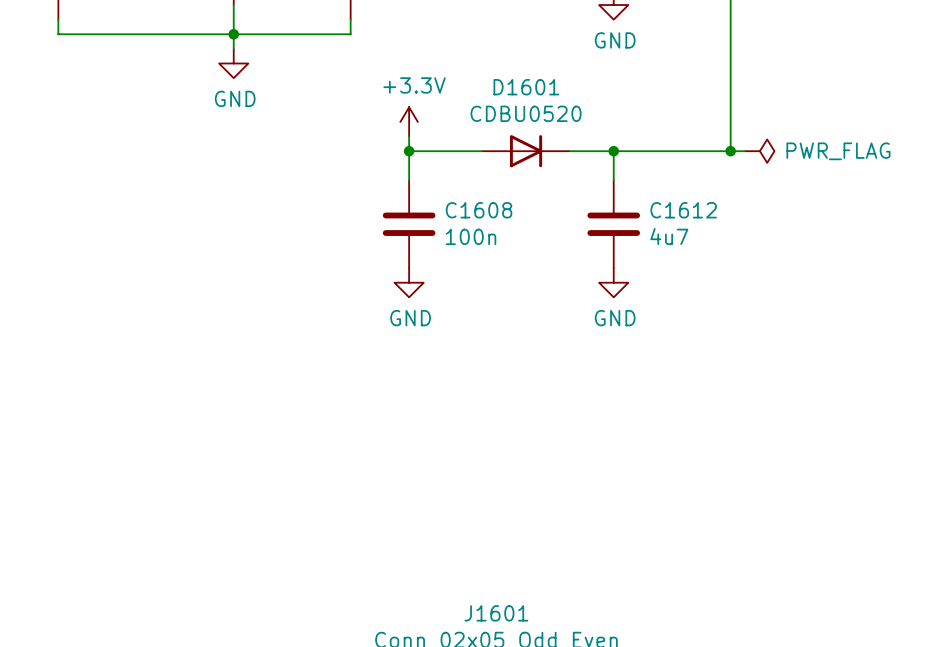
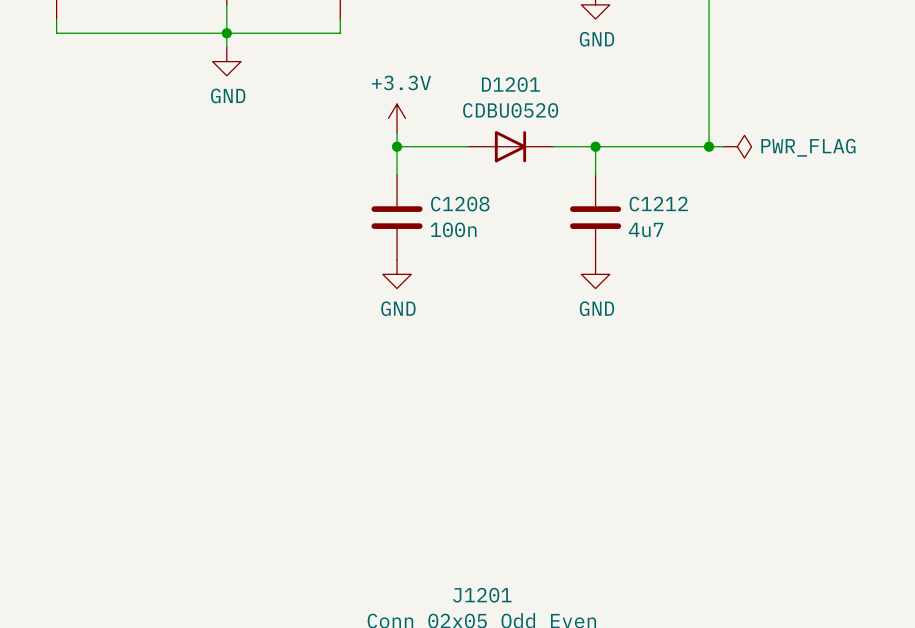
D1601 name: D1601 (526, 87) -> D1201 (510, 84)
C1608 name: C1608 (479, 210) -> C1208 (460, 204)
C1612 name: C1612 (683, 210) -> C1212 (658, 204)
J1601 name: J1601 (496, 613) -> J1201 (482, 595)

